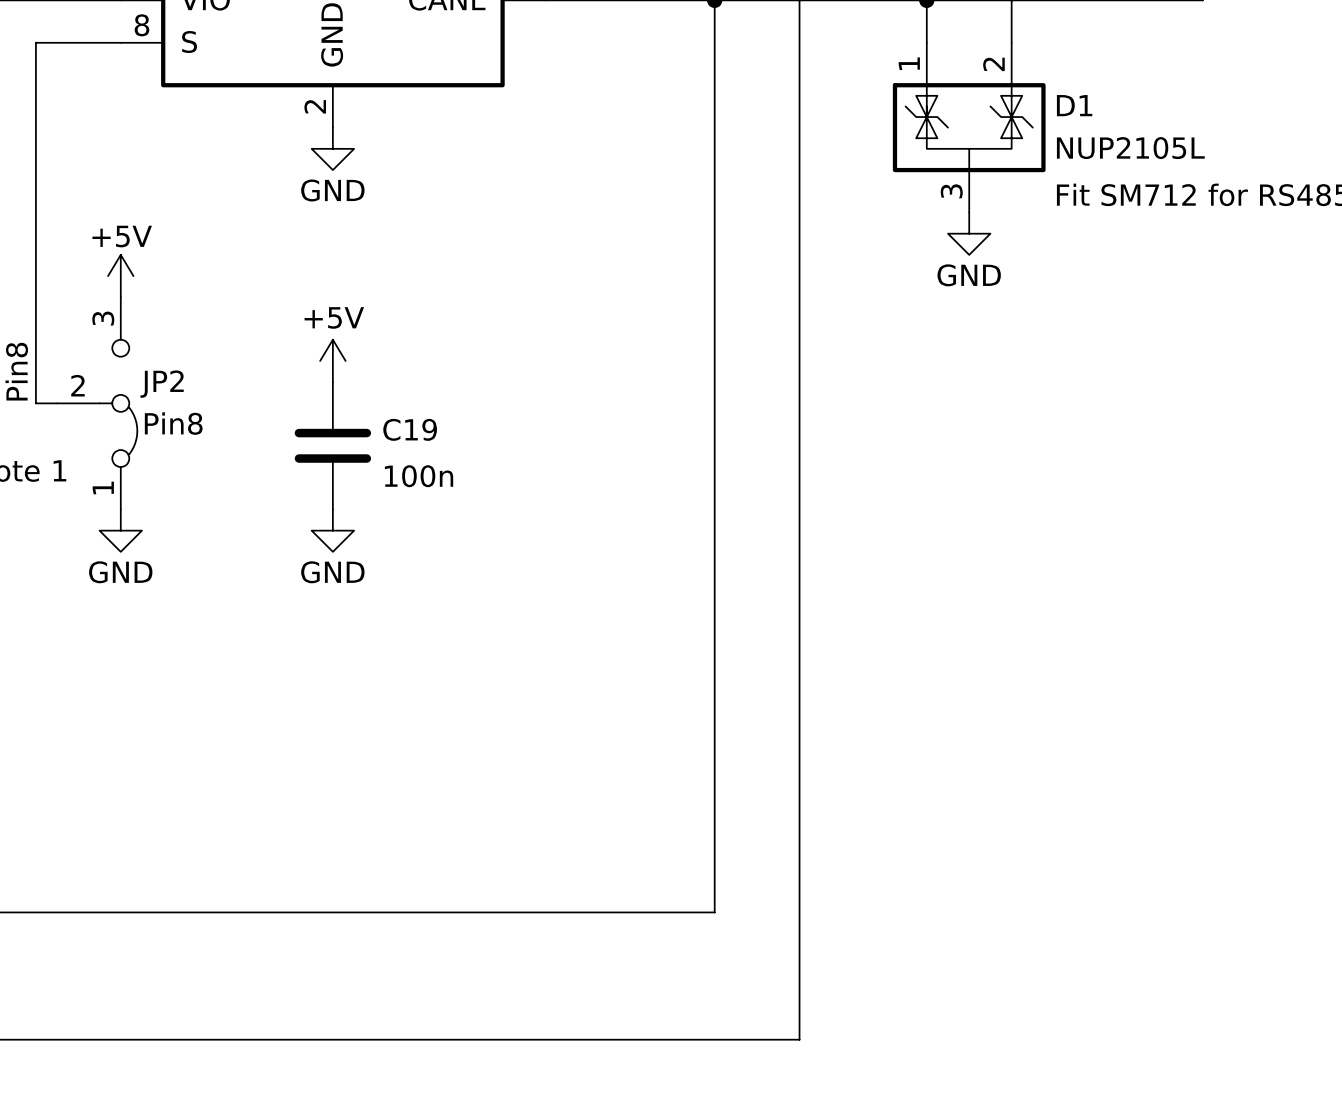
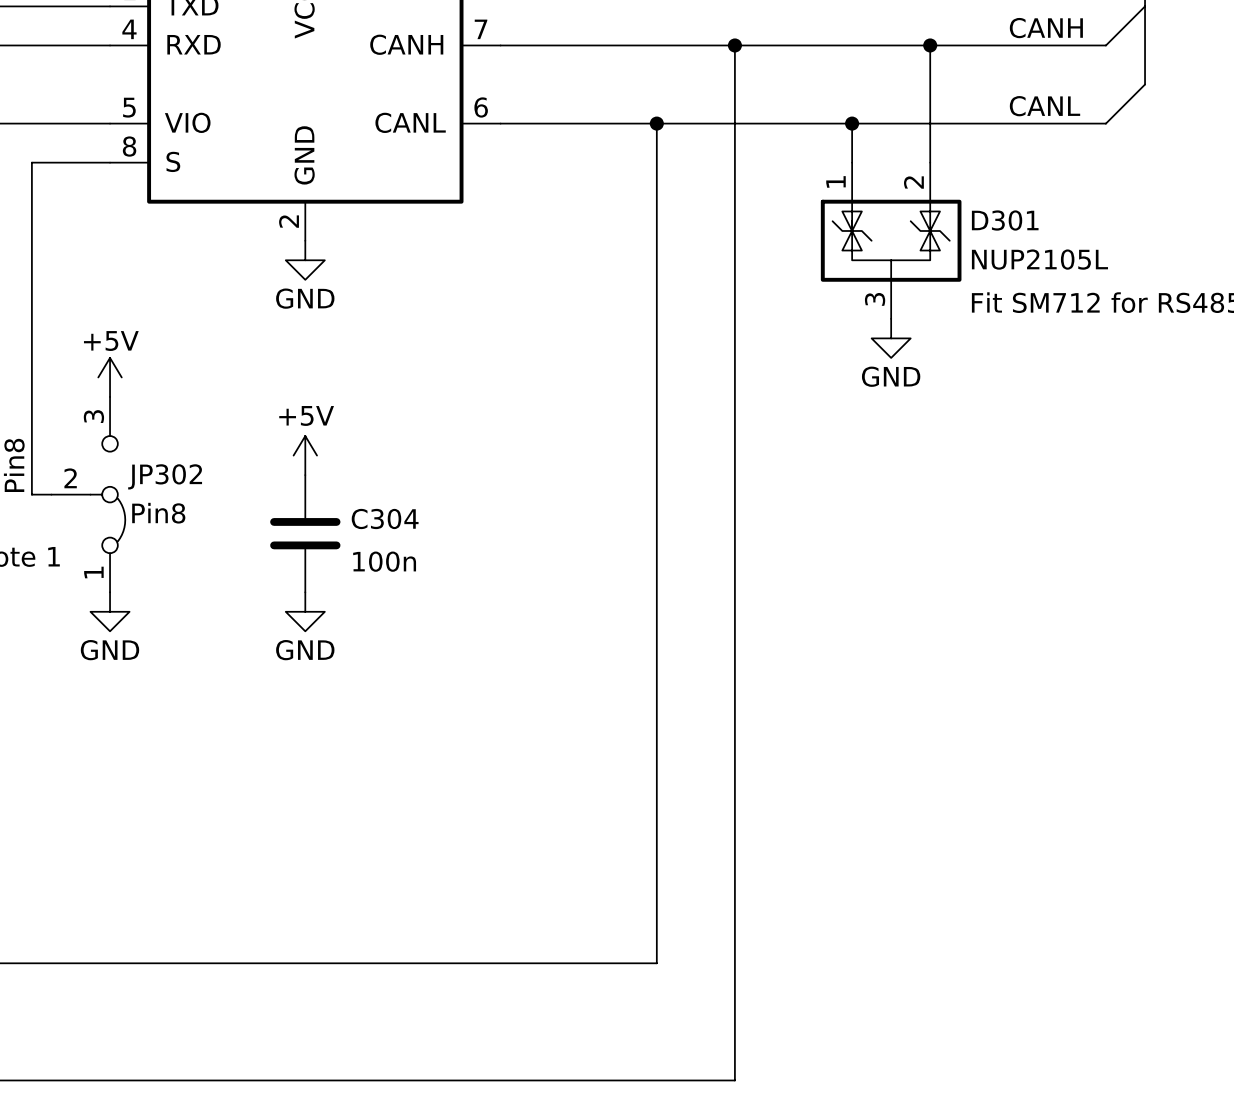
D1 name: D1 (1074, 105) -> D301 (1005, 220)
JP2 name: JP2 (162, 384) -> JP302 (165, 476)
C19 name: C19 (410, 429) -> C304 (385, 518)

